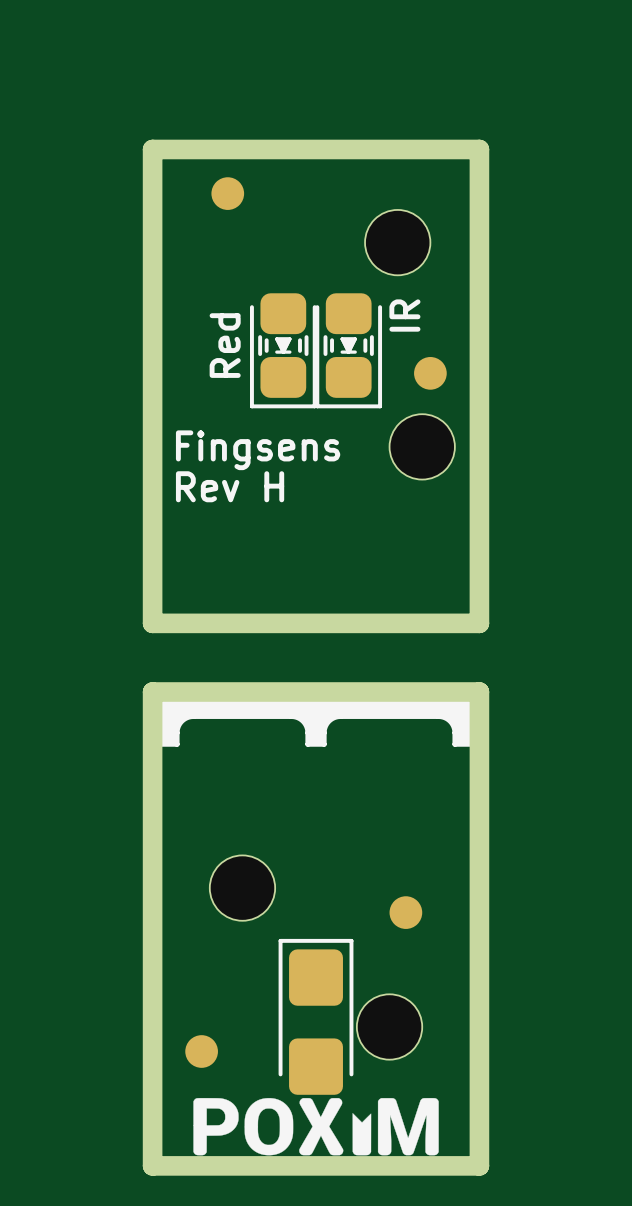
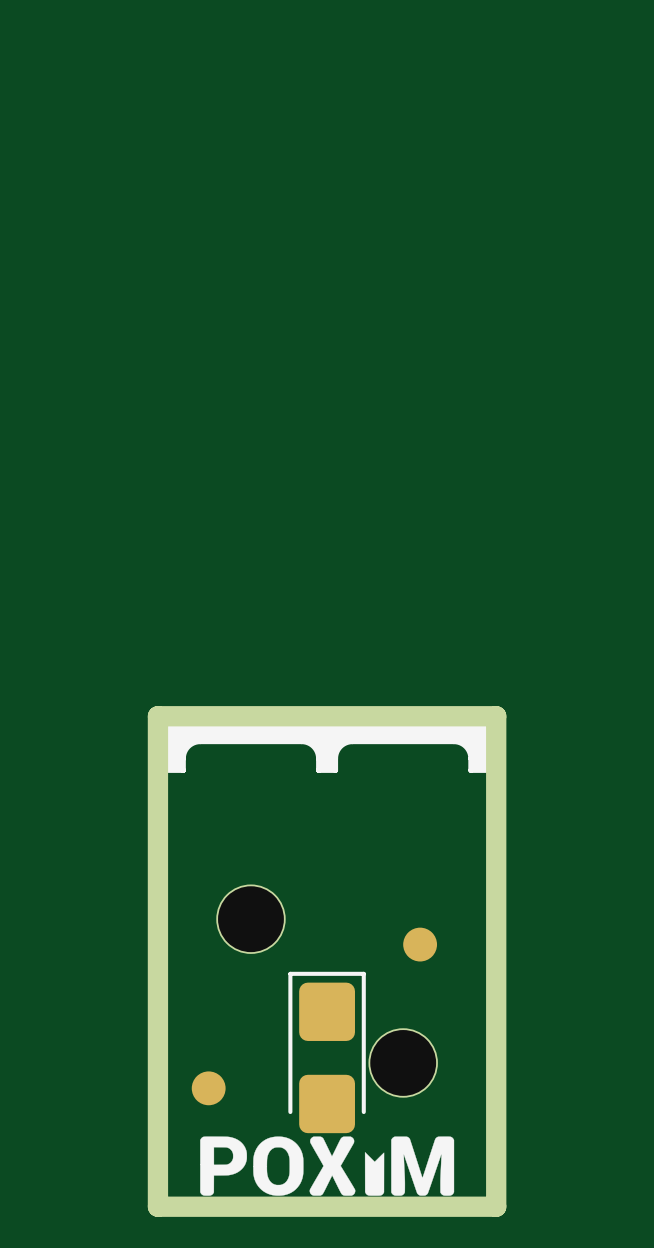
board edge: (152, 149) (479, 149) (479, 623) (152, 623) (152, 149) -> none
part: (227, 193) -> none
part: (397, 242) -> none
text: IR (404, 315) -> none
text: Red (225, 345) -> none
part: (283, 350) -> none
part: (348, 350) -> none
part: (430, 373) -> none
part: (422, 446) -> none
text: Fingsens (258, 450) -> none
text: Rev H (230, 486) -> none

